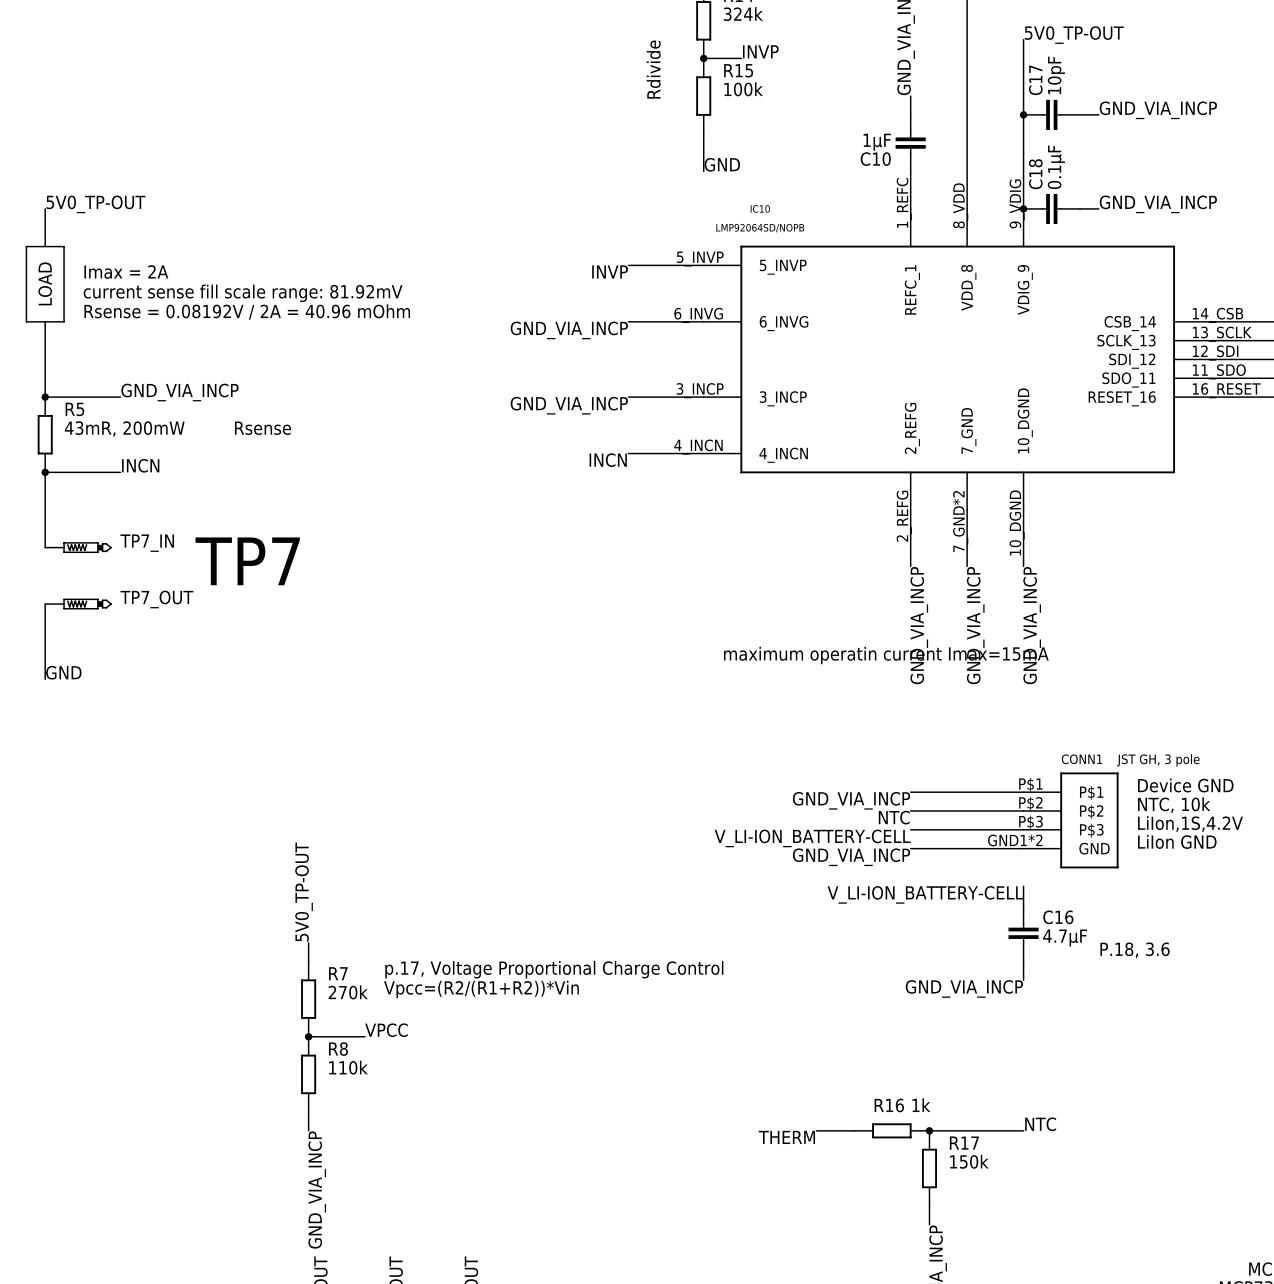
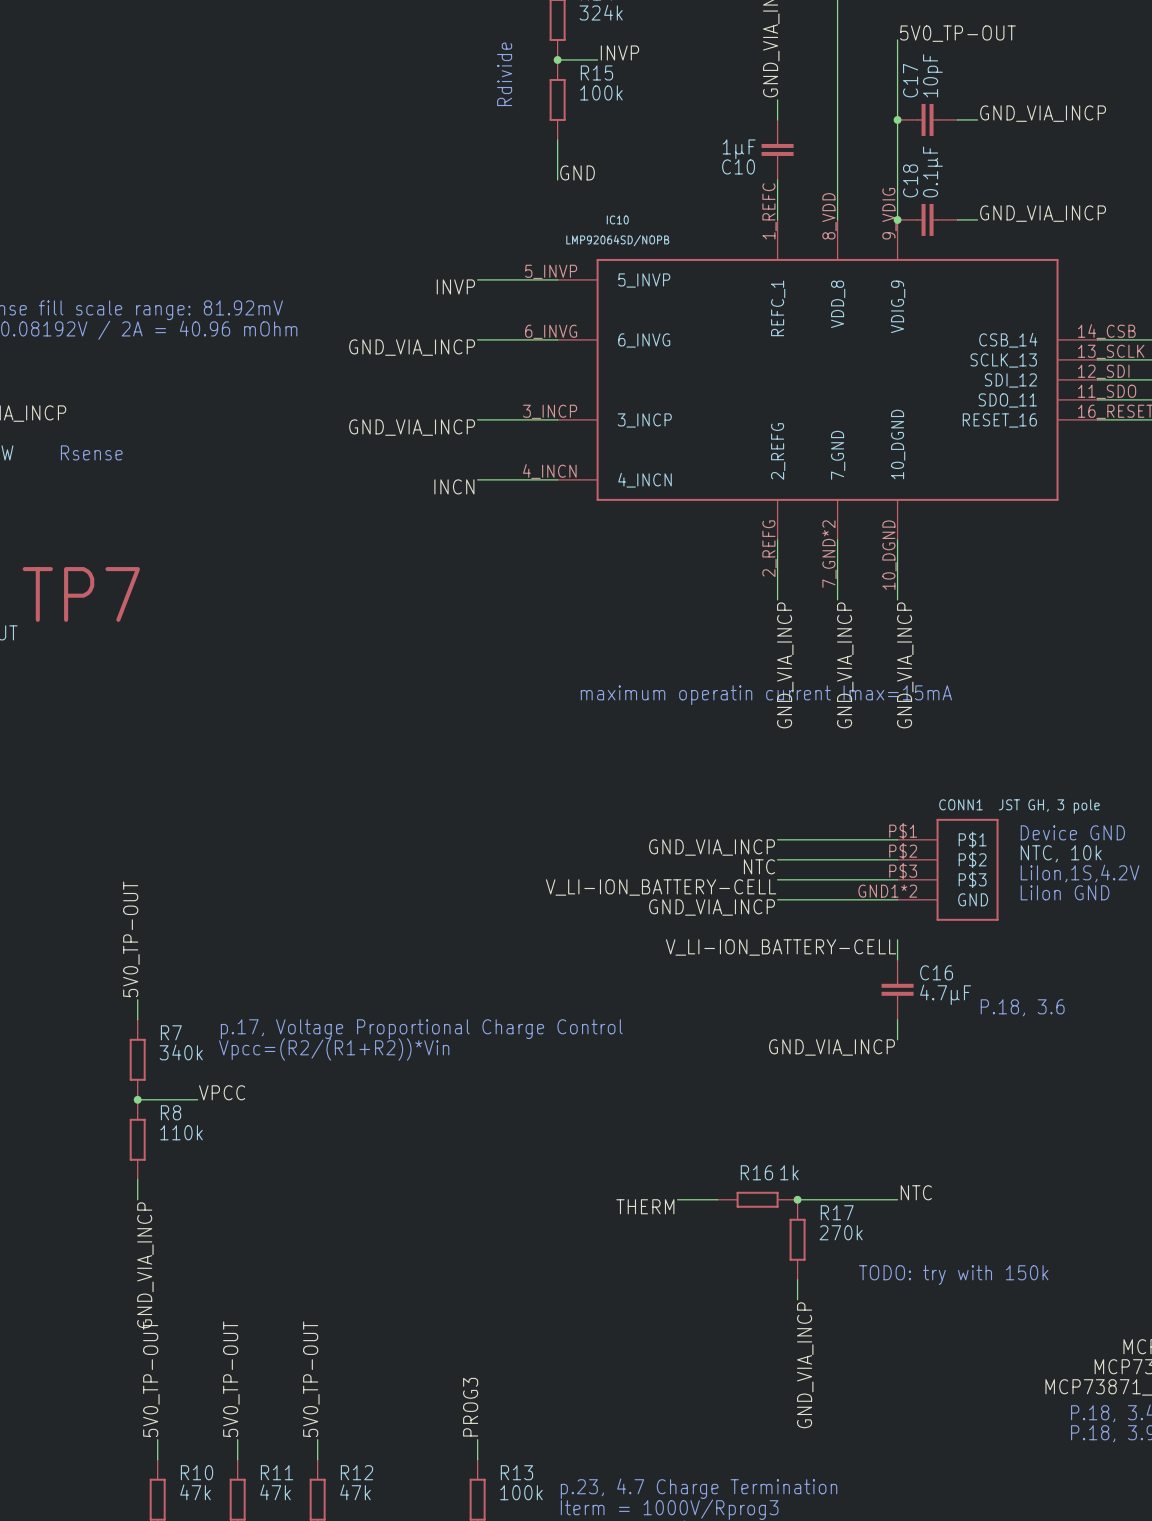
R7 value: 270k (348, 992) -> 340k (181, 1052)
R17 value: 150k (969, 1161) -> 270k (841, 1232)
text: none -> TODO: try with 150k (953, 1275)

